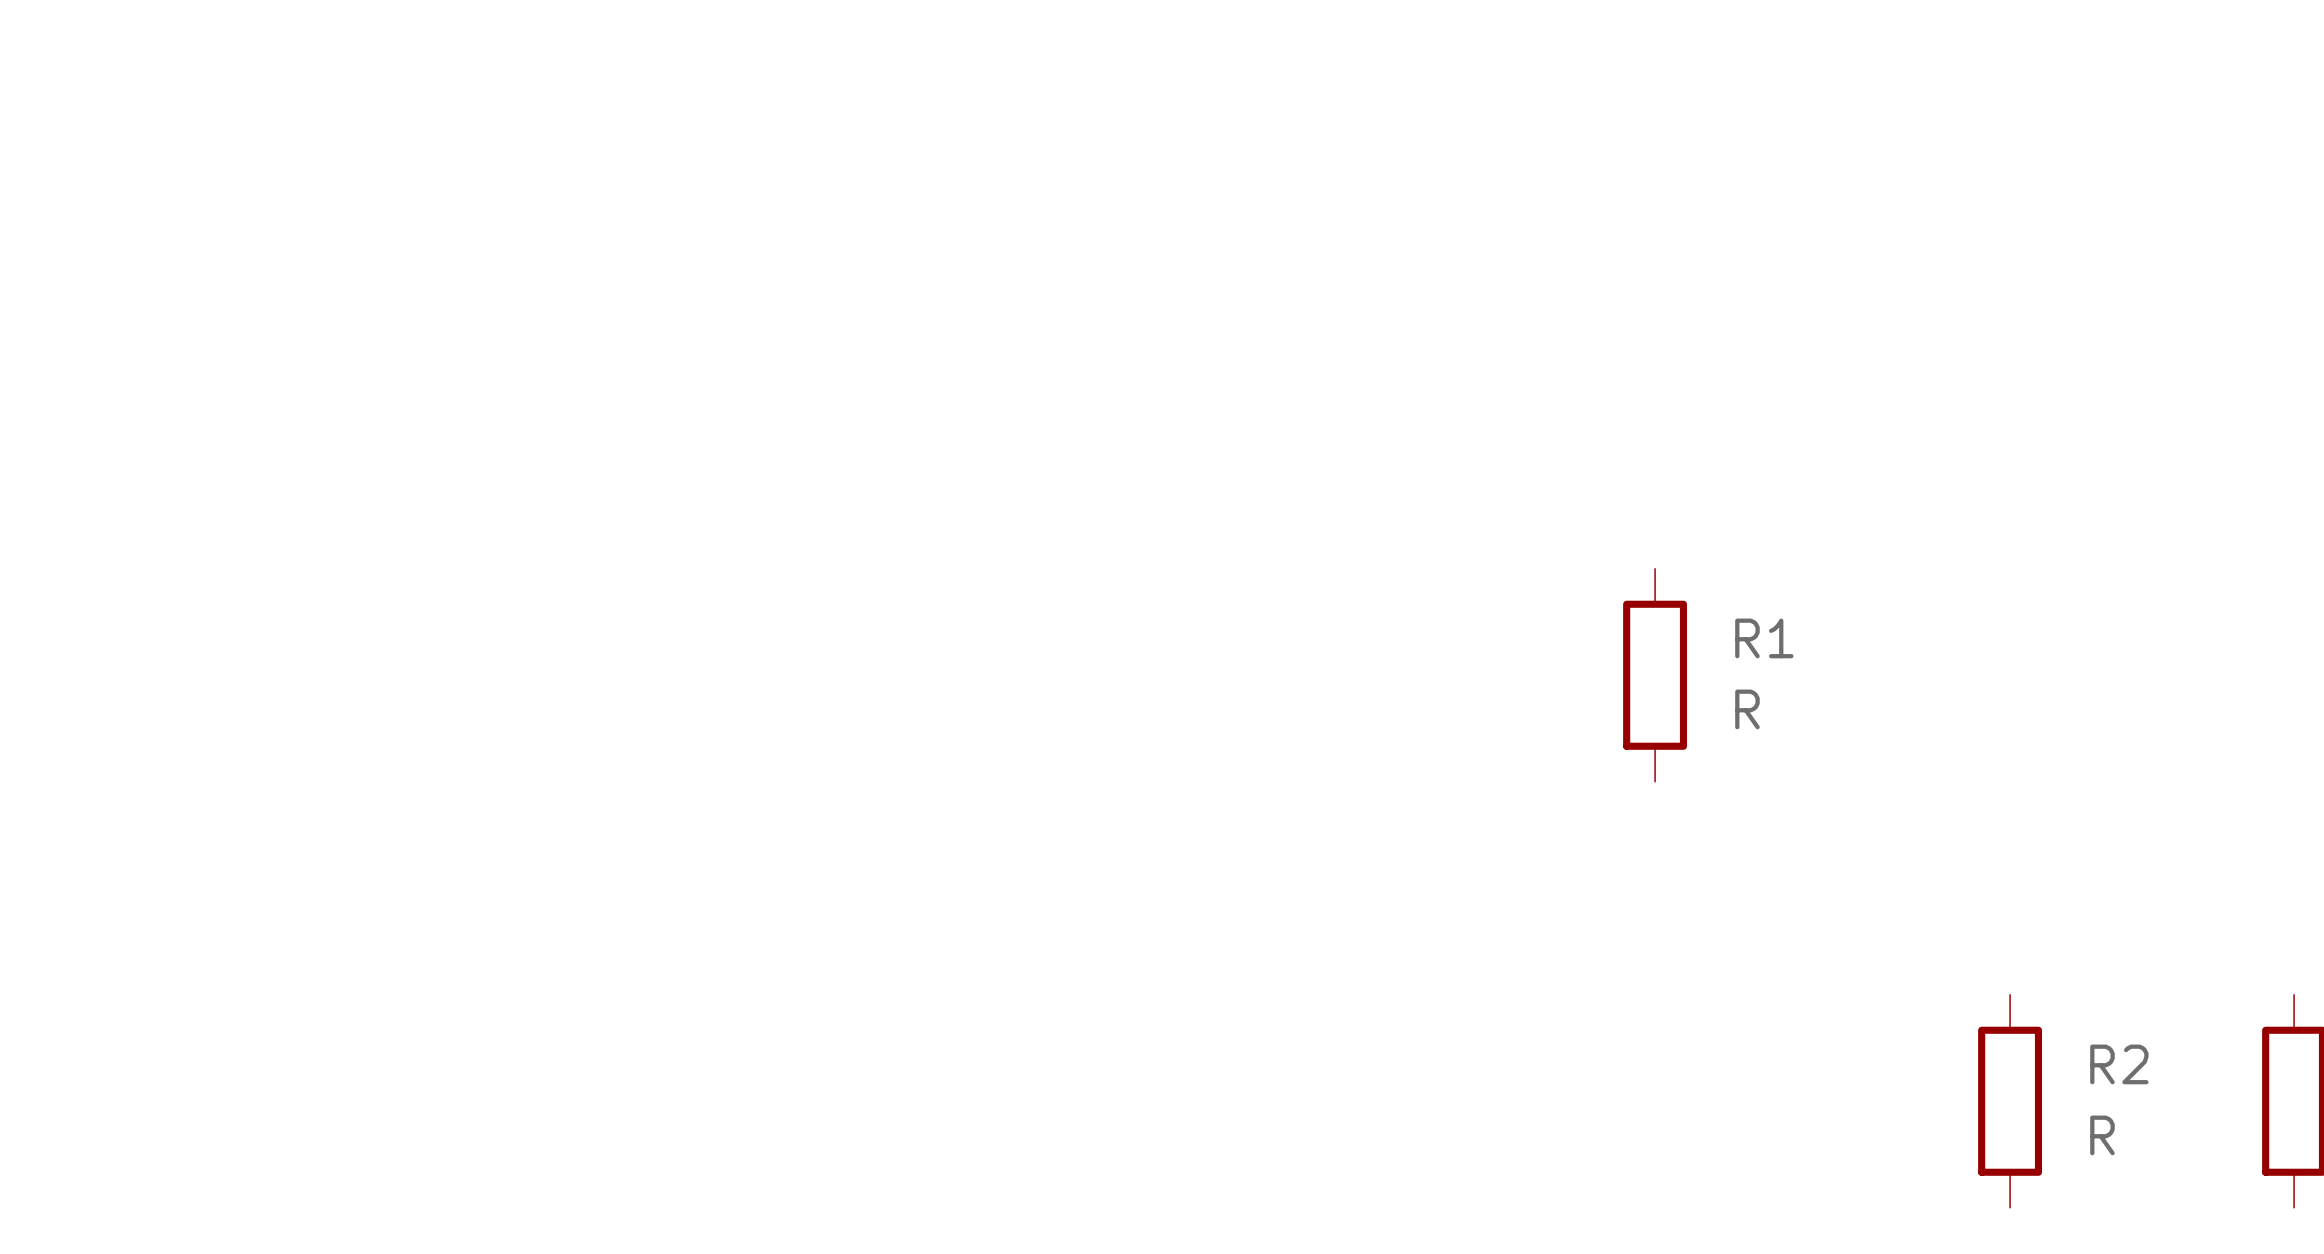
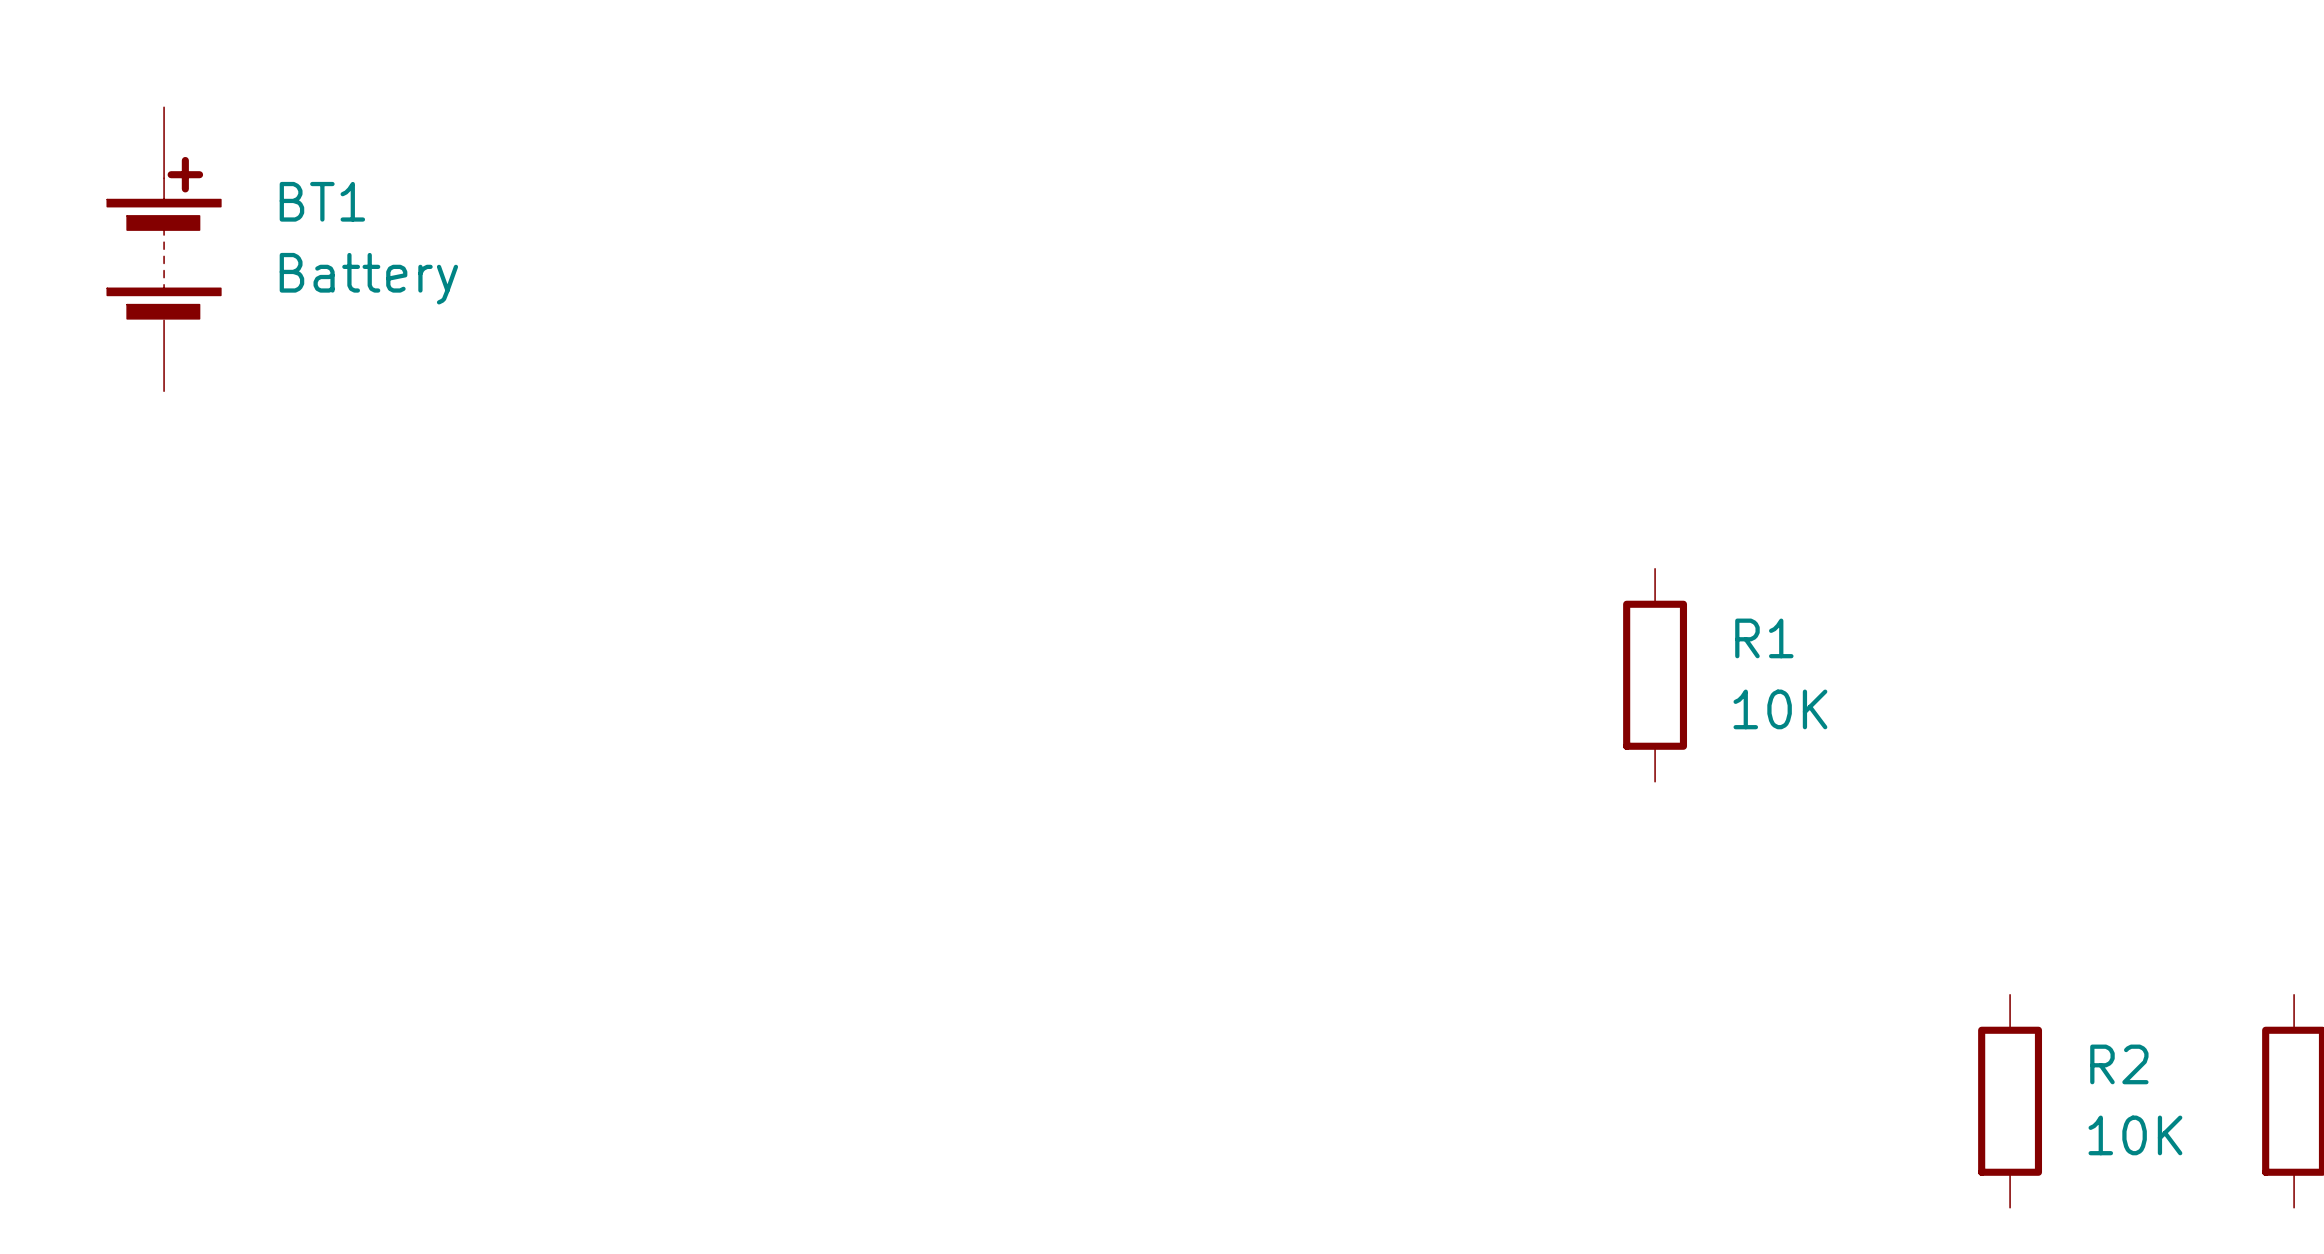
BT1: none -> Battery (164, 249)
R1 value: R (1747, 709) -> 10K (1780, 709)
R2 value: R (2102, 1135) -> 10K (2135, 1135)

